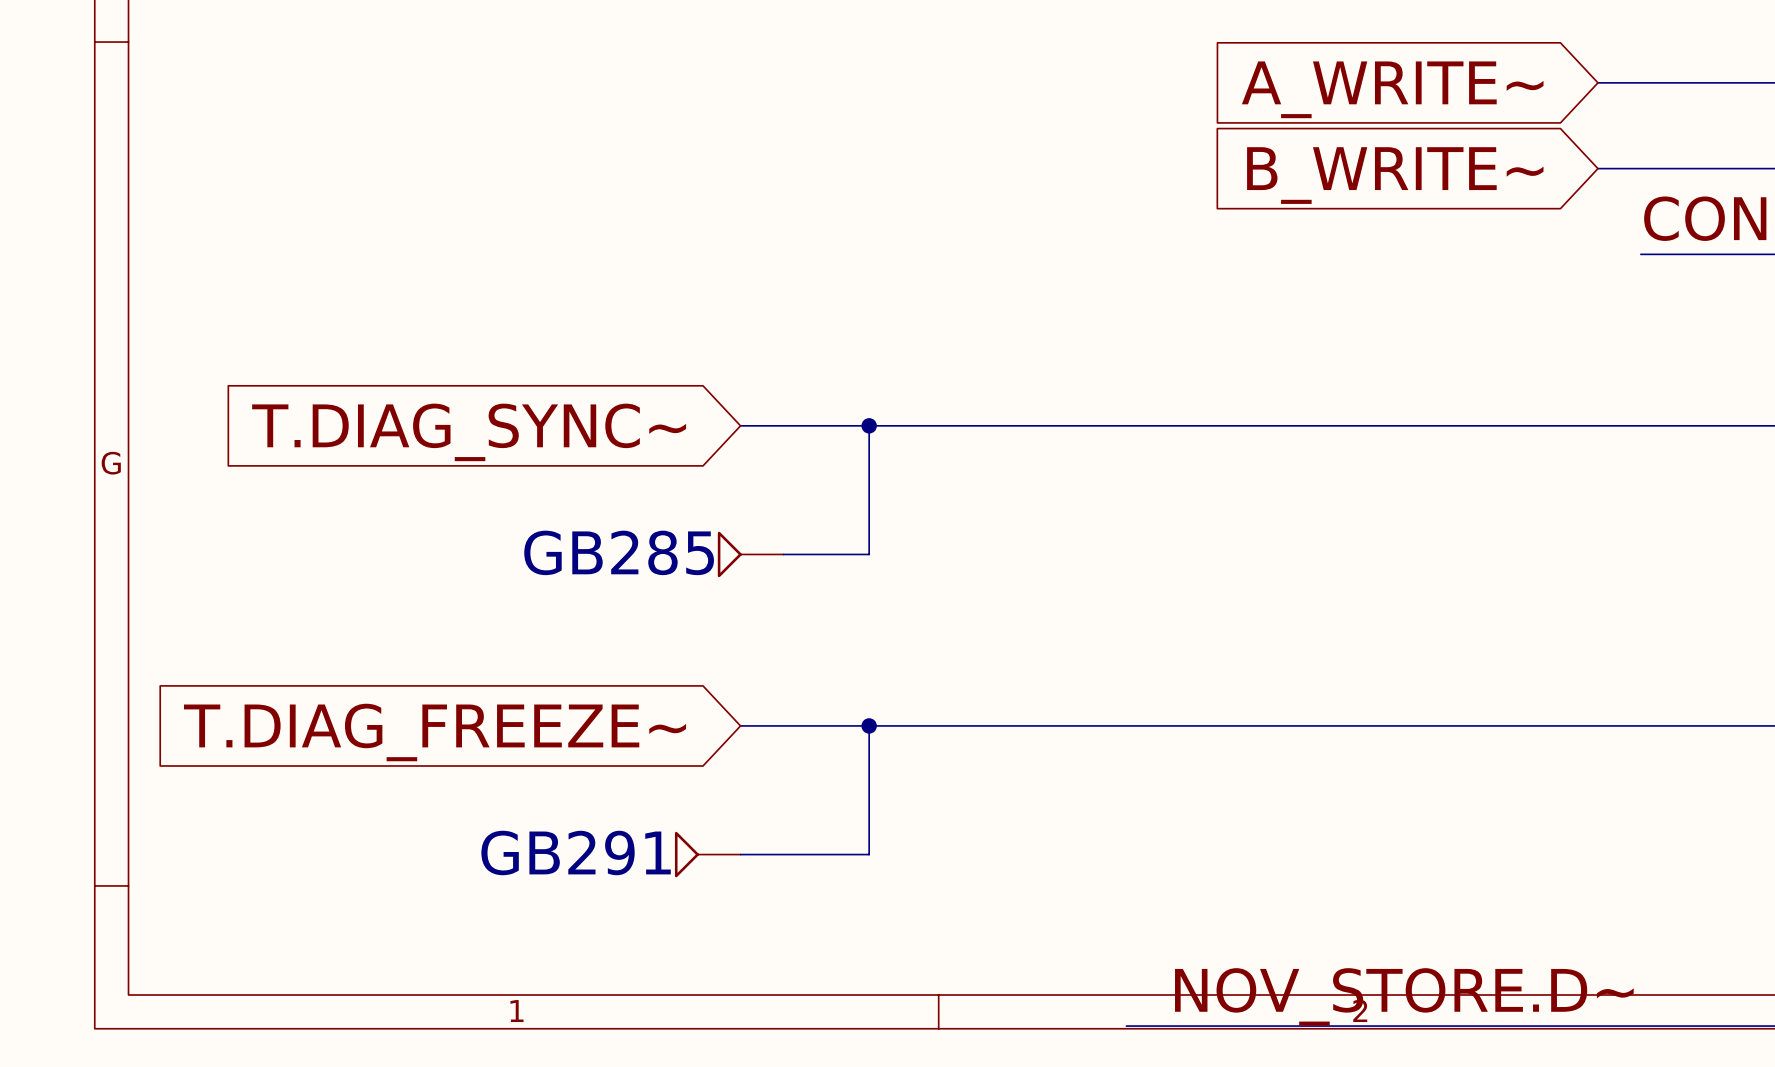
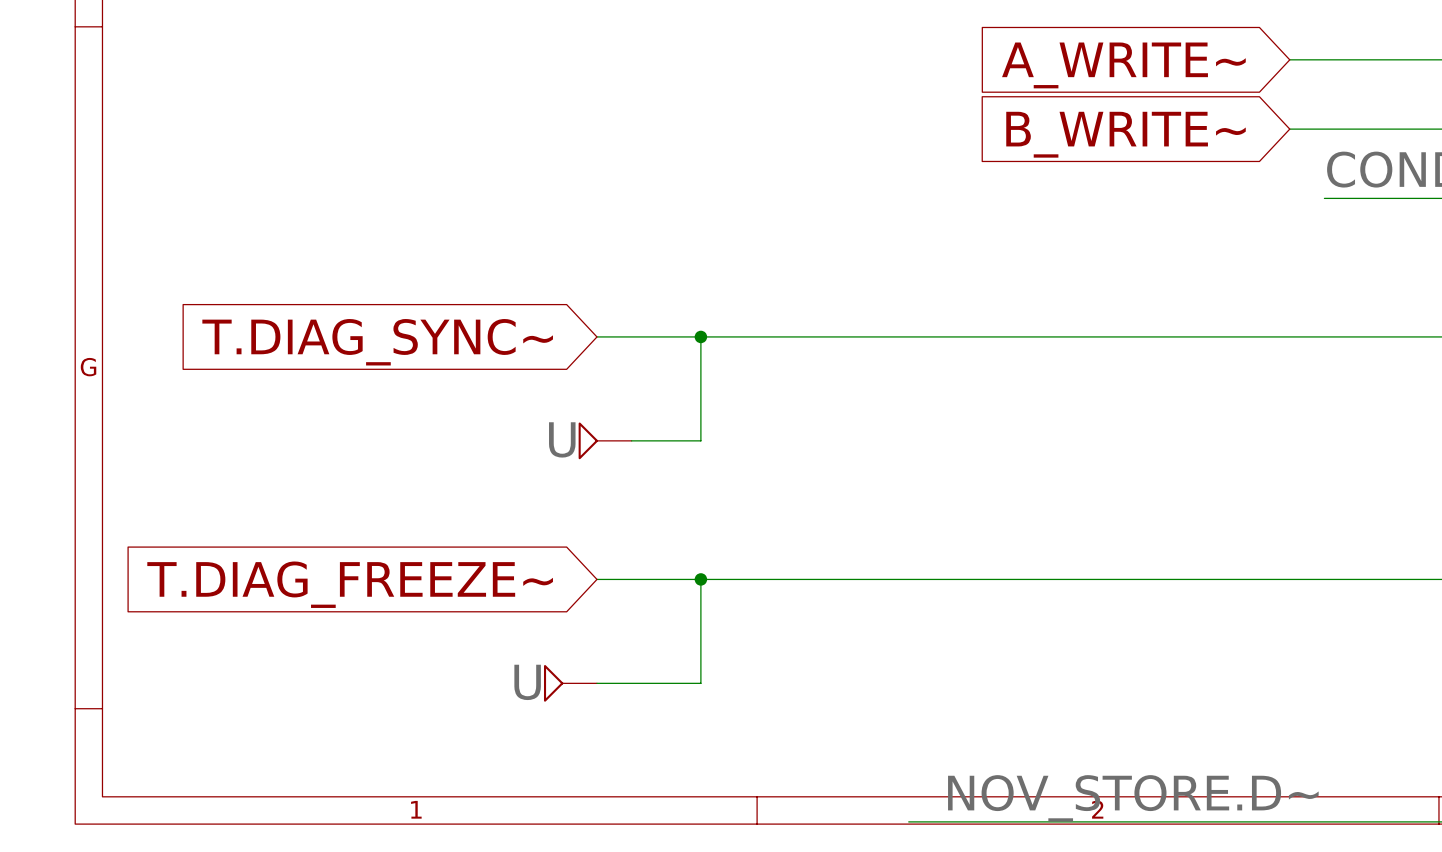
GB285 name: GB285 (619, 552) -> U (562, 439)
GB291 name: GB291 (576, 852) -> U (527, 682)

